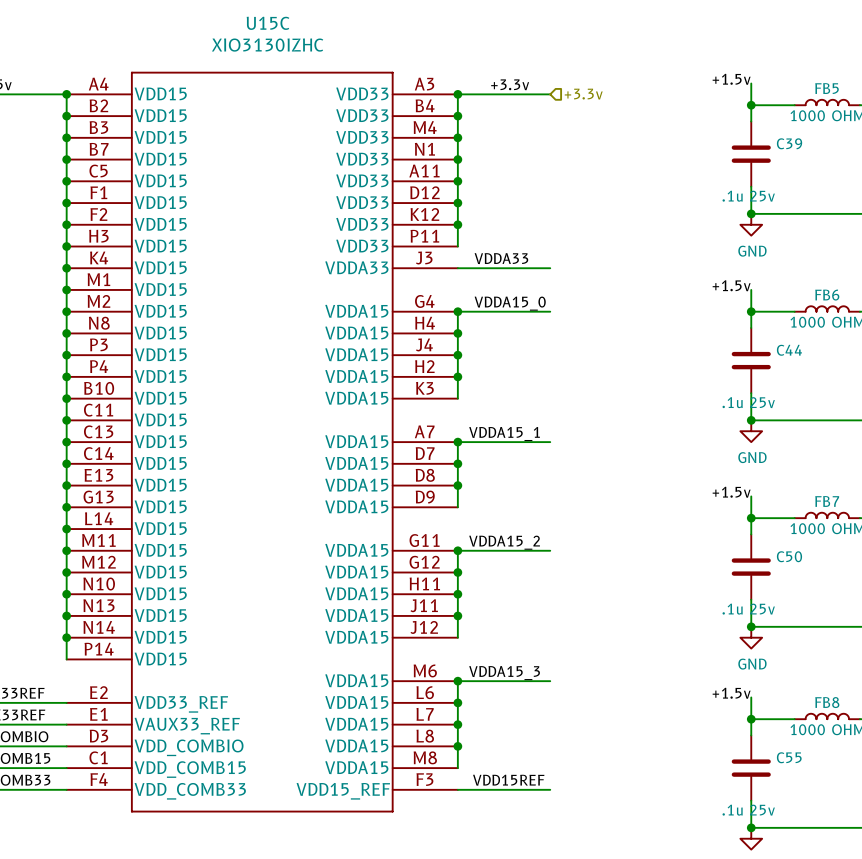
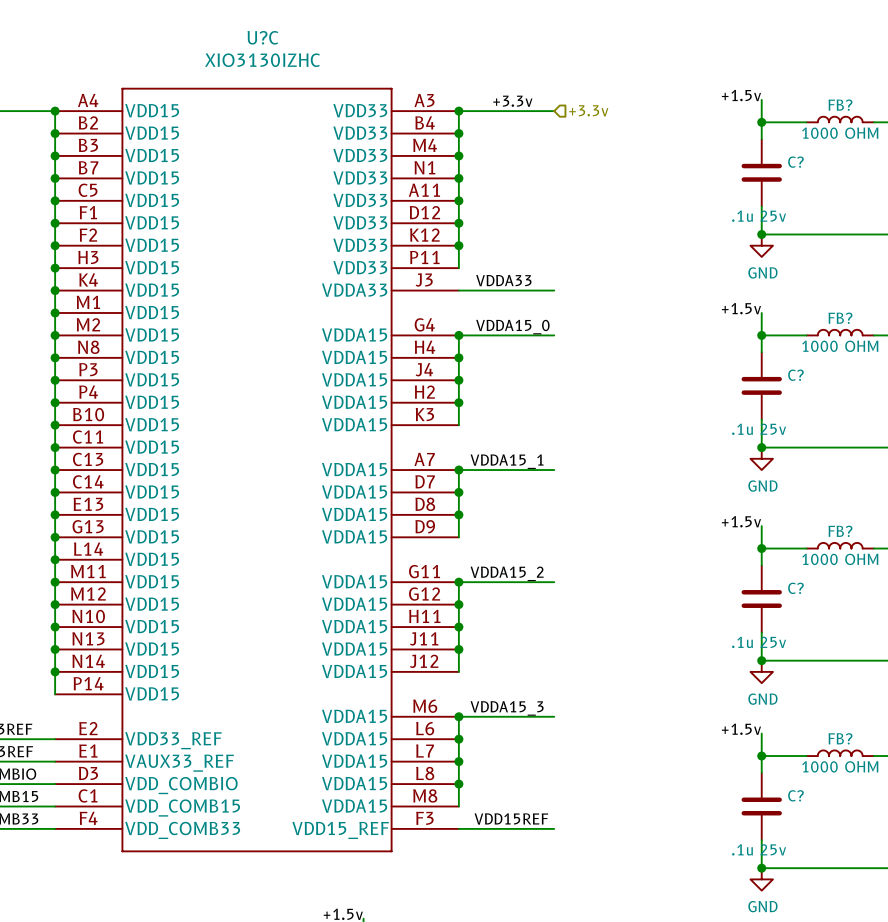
U15C name: U15C (268, 23) -> U?C (262, 37)
FB5 name: FB5 (827, 88) -> FB? (840, 105)
C39 name: C39 (789, 143) -> C? (795, 162)
FB6 name: FB6 (827, 295) -> FB? (840, 318)
C44 name: C44 (789, 350) -> C? (795, 375)
FB7 name: FB7 (827, 501) -> FB? (840, 531)
C50 name: C50 (789, 556) -> C? (795, 588)
FB8 name: FB8 (827, 702) -> FB? (840, 738)
C55 name: C55 (789, 757) -> C? (795, 795)

